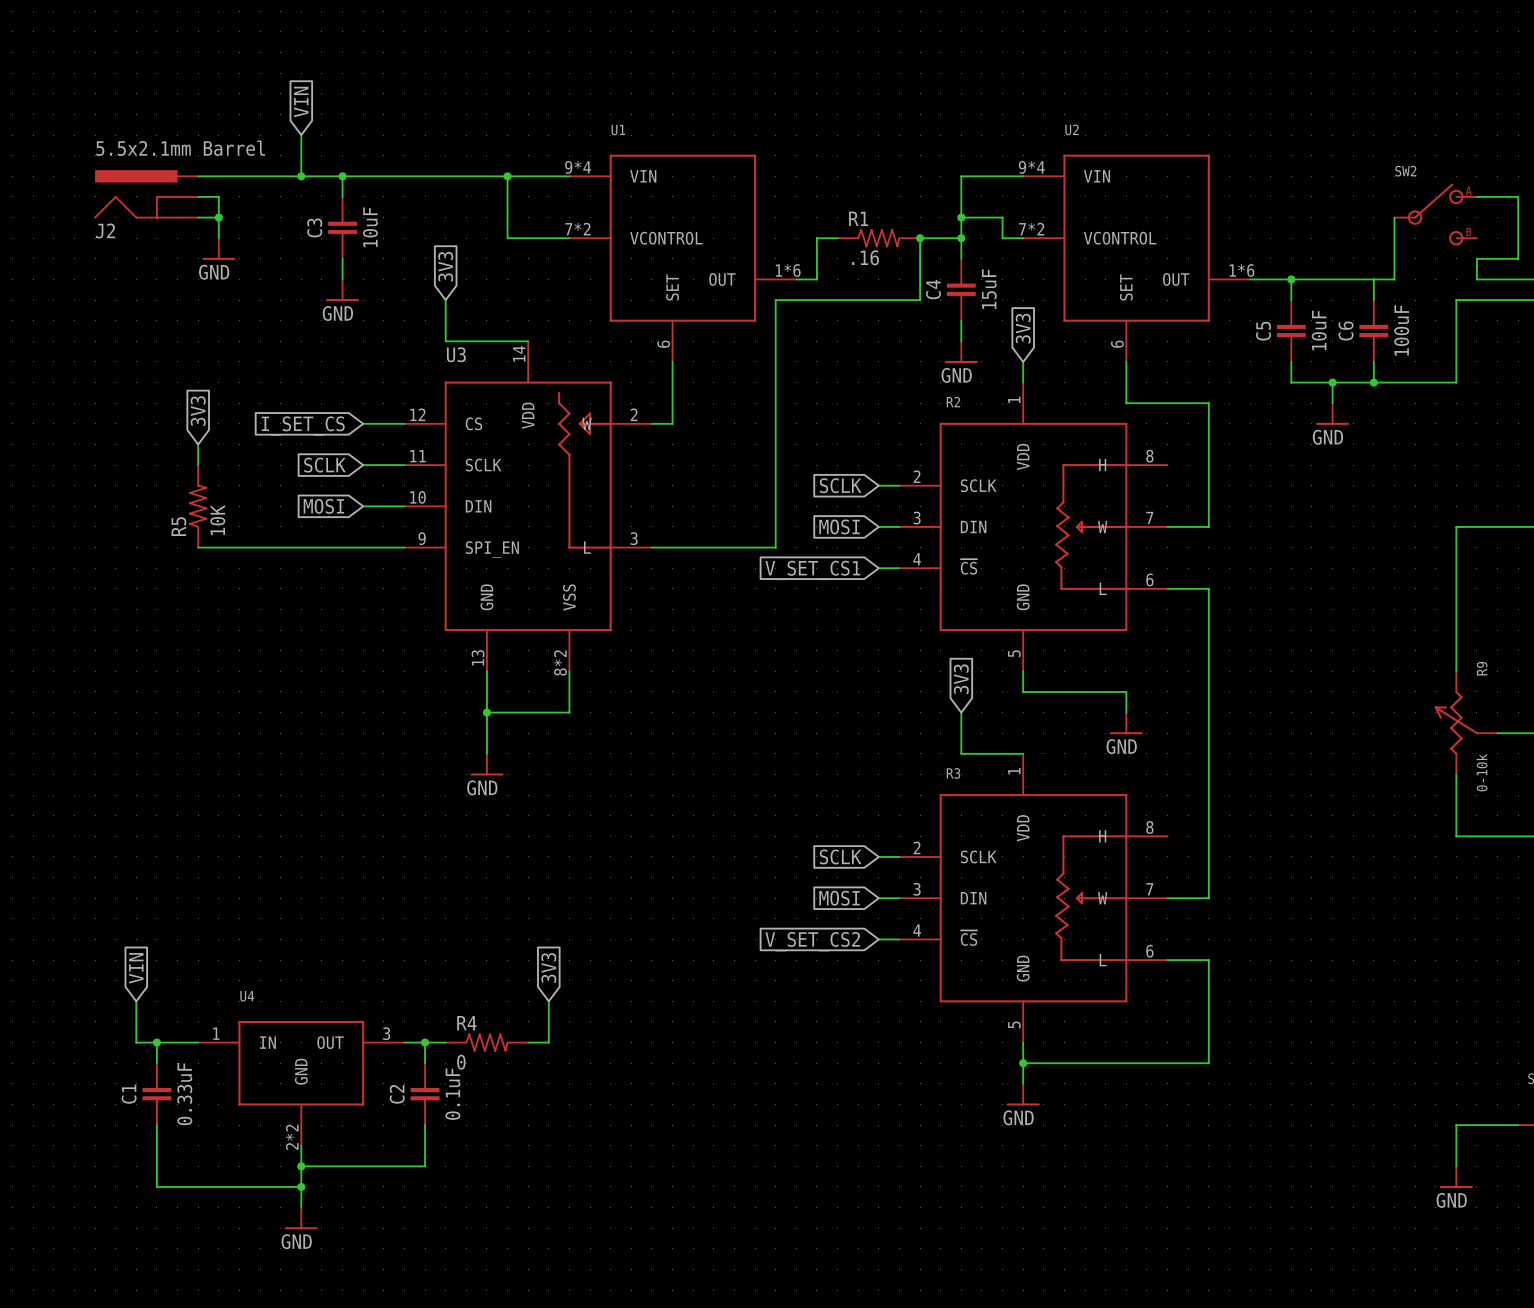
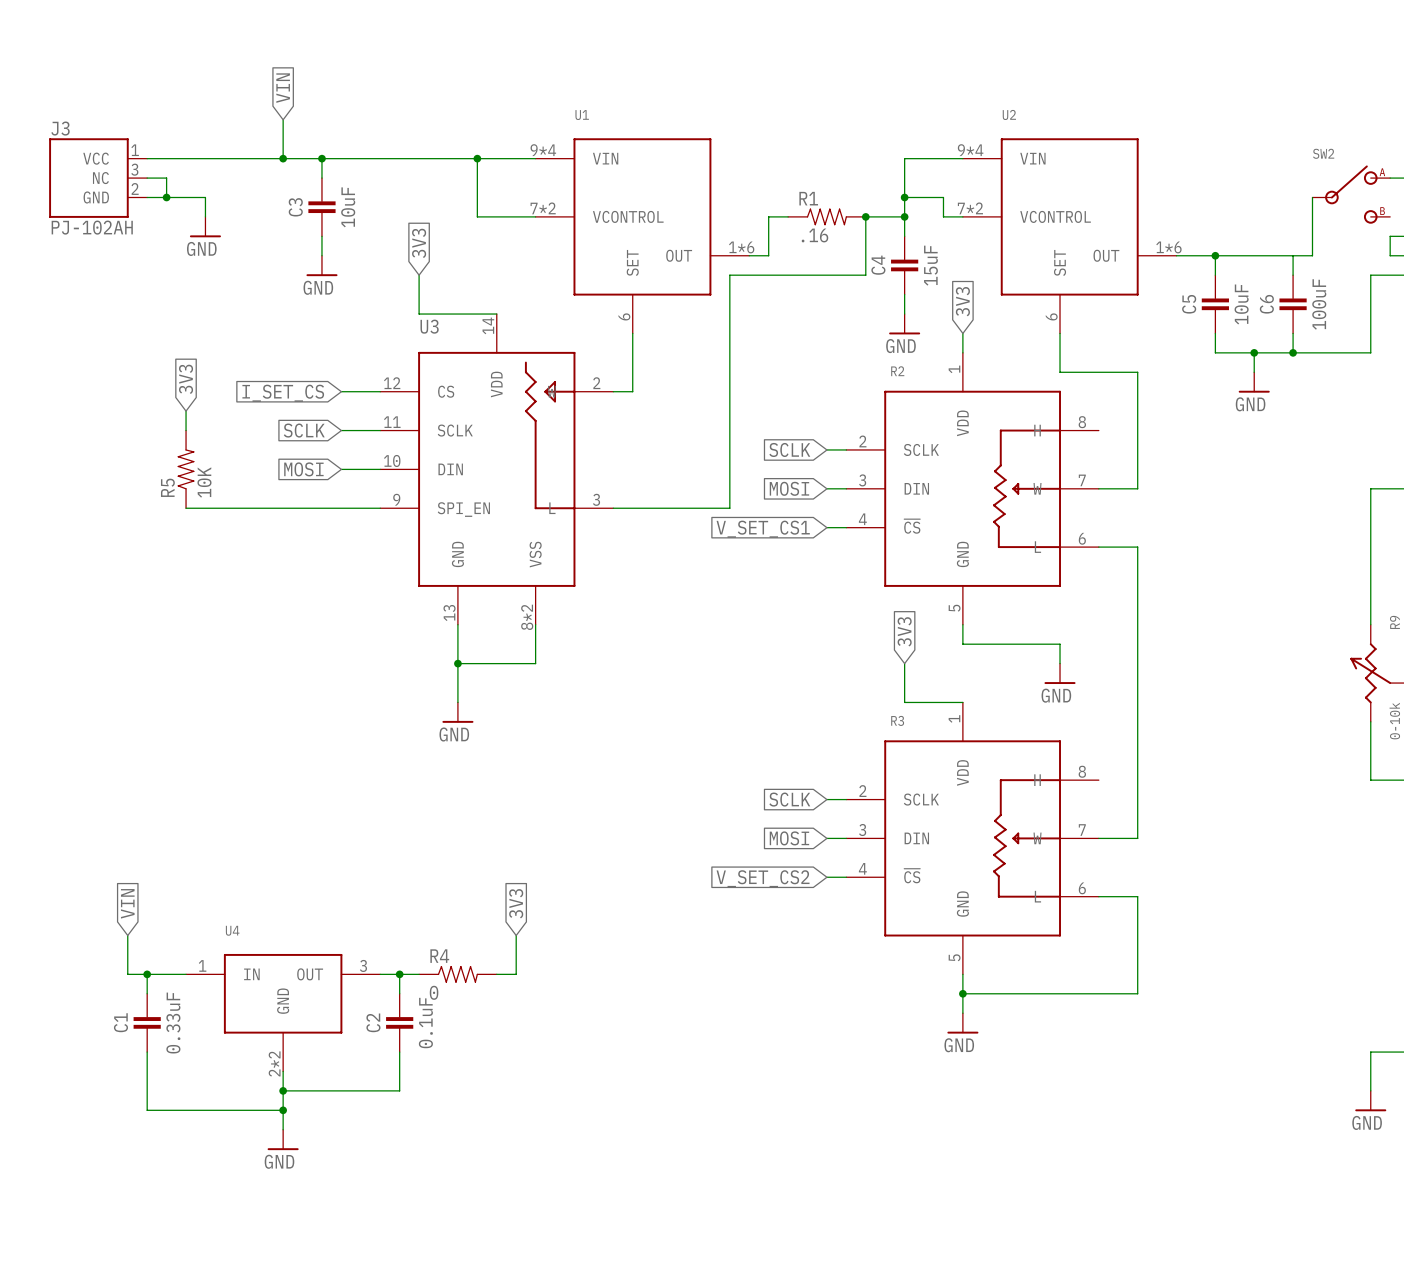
J2: 5.5x2.1mm Barrel (146, 194) -> none
J3: none -> PJ-102AH (98, 178)
wire: (198, 196) (218, 196) (218, 217) -> (147, 178) (166, 178) (166, 197)
junction position: (218, 217) -> (166, 197)

